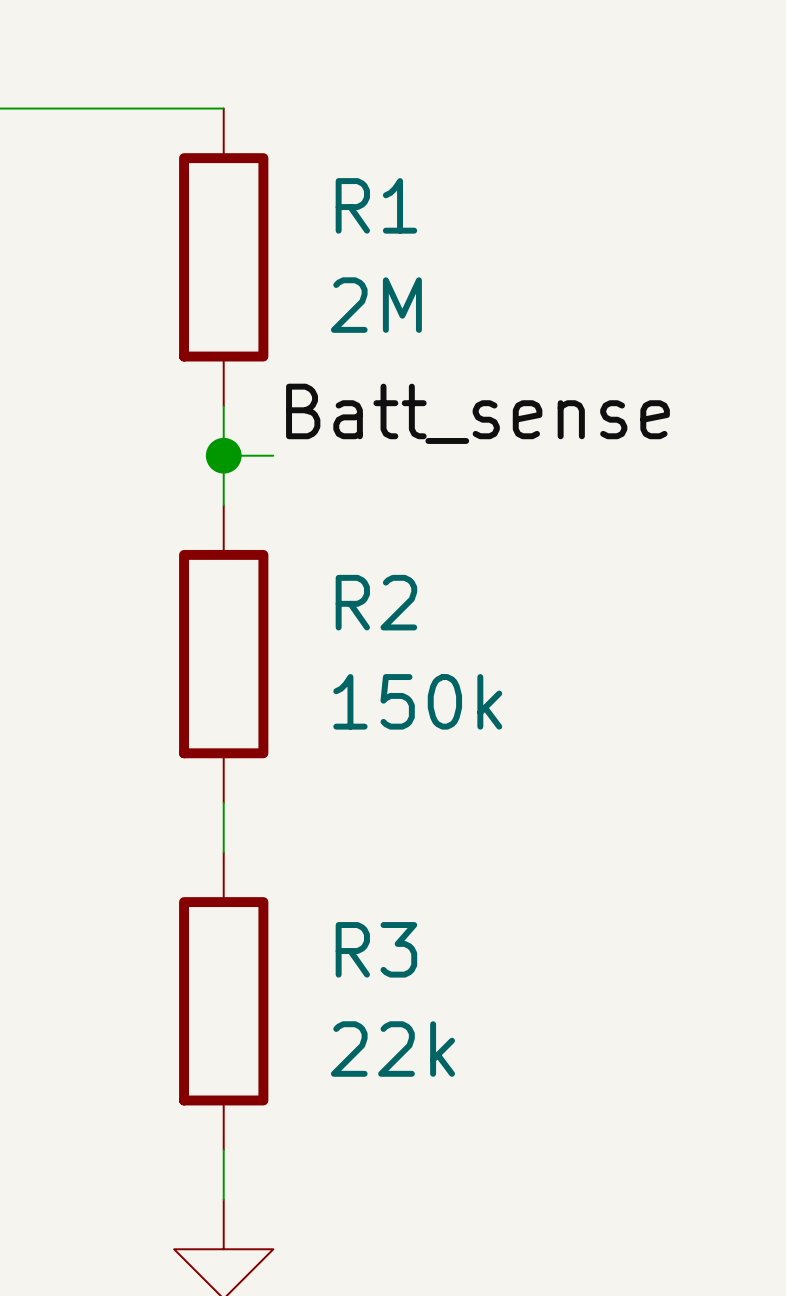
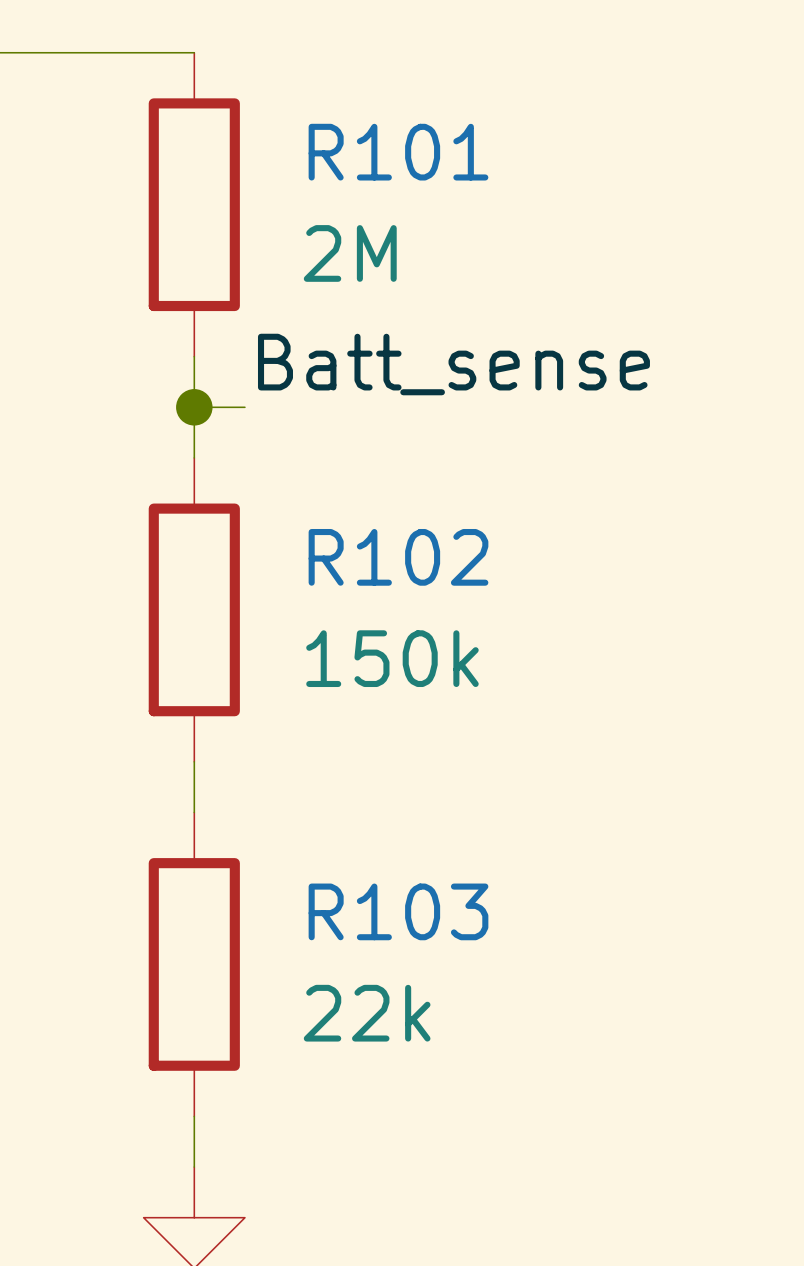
R1 name: R1 (376, 205) -> R101 (398, 152)
R2 name: R2 (376, 602) -> R102 (398, 557)
R3 name: R3 (376, 949) -> R103 (398, 911)

